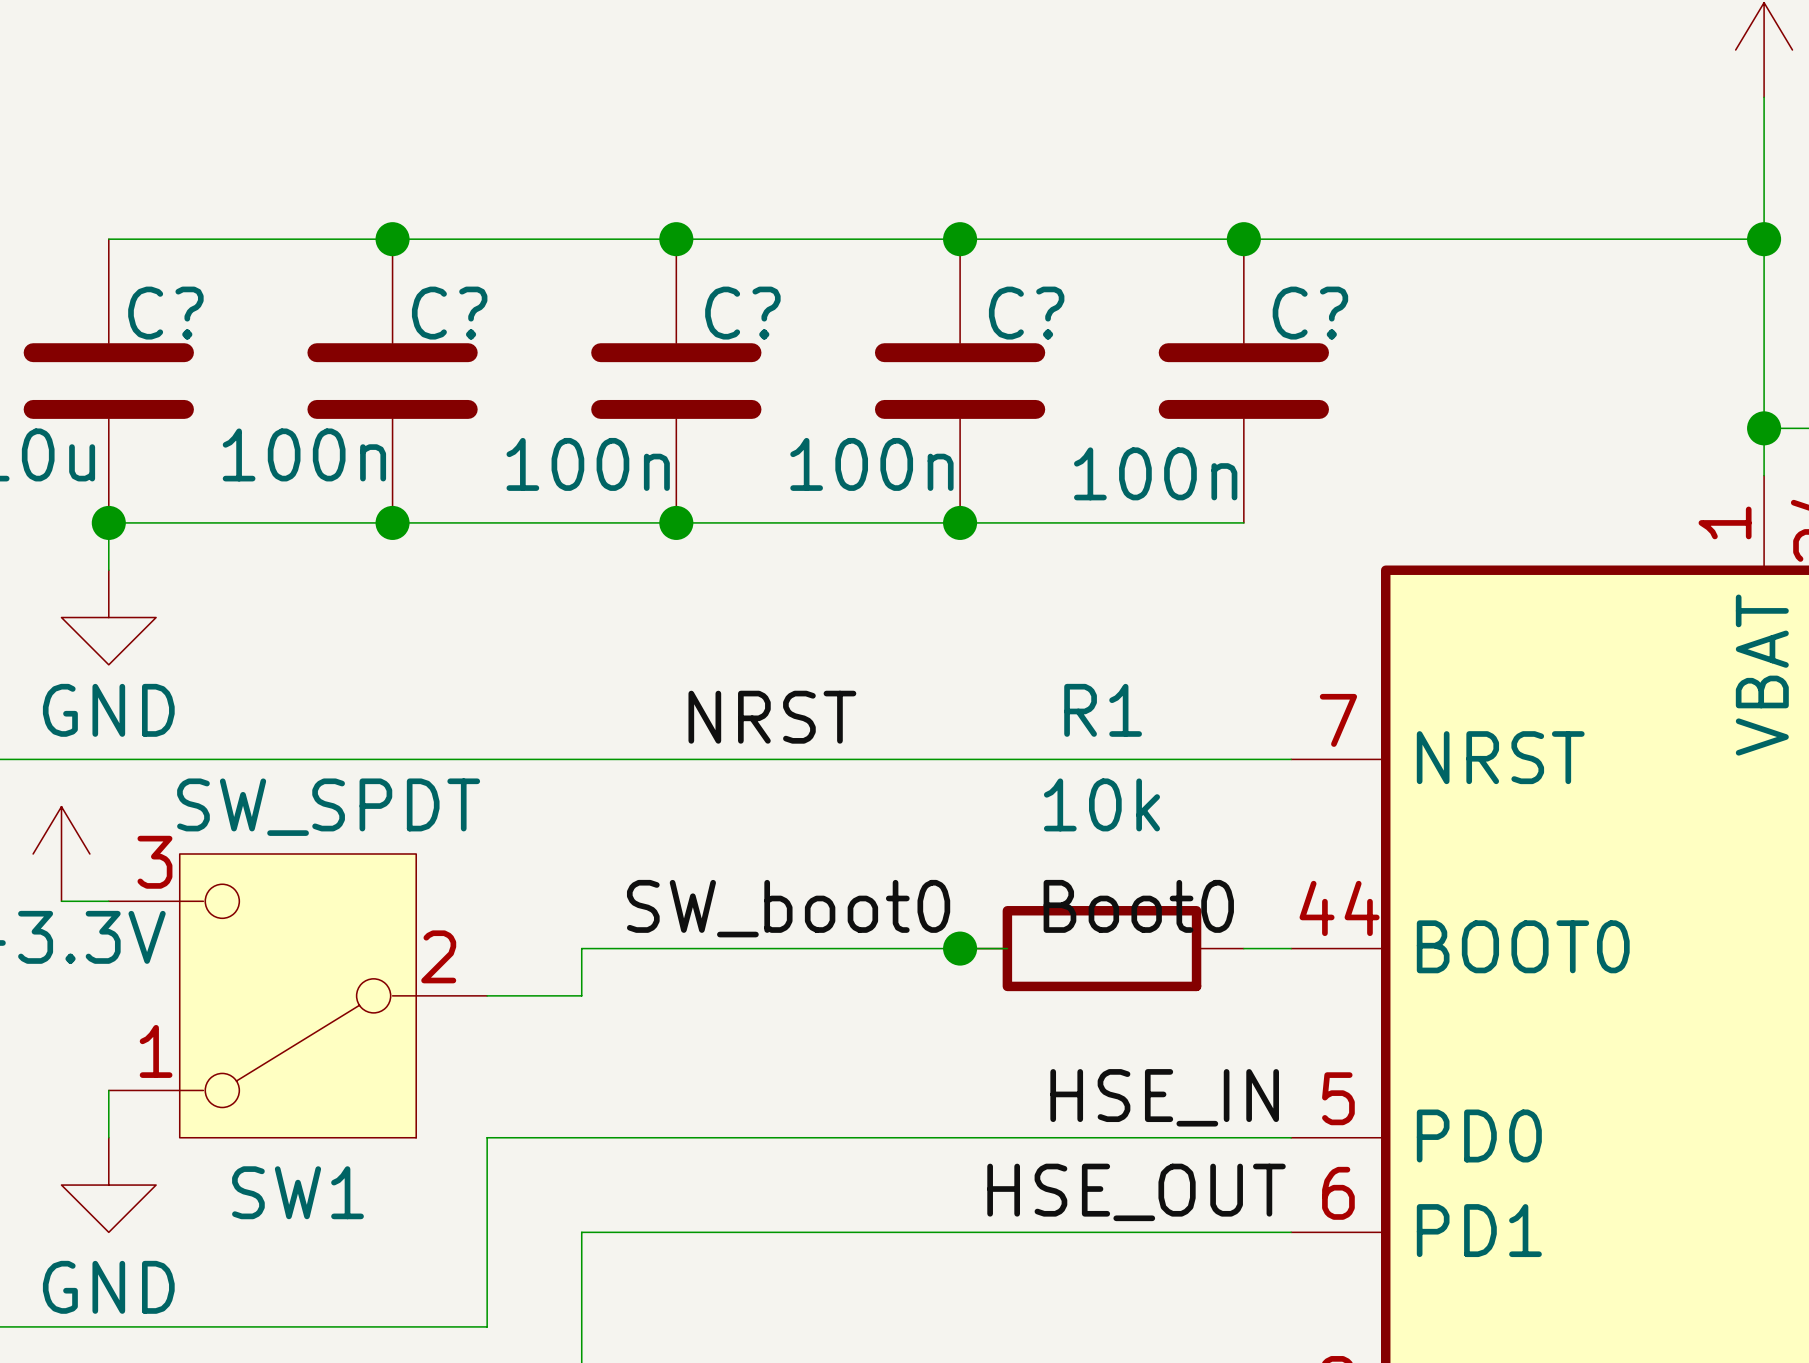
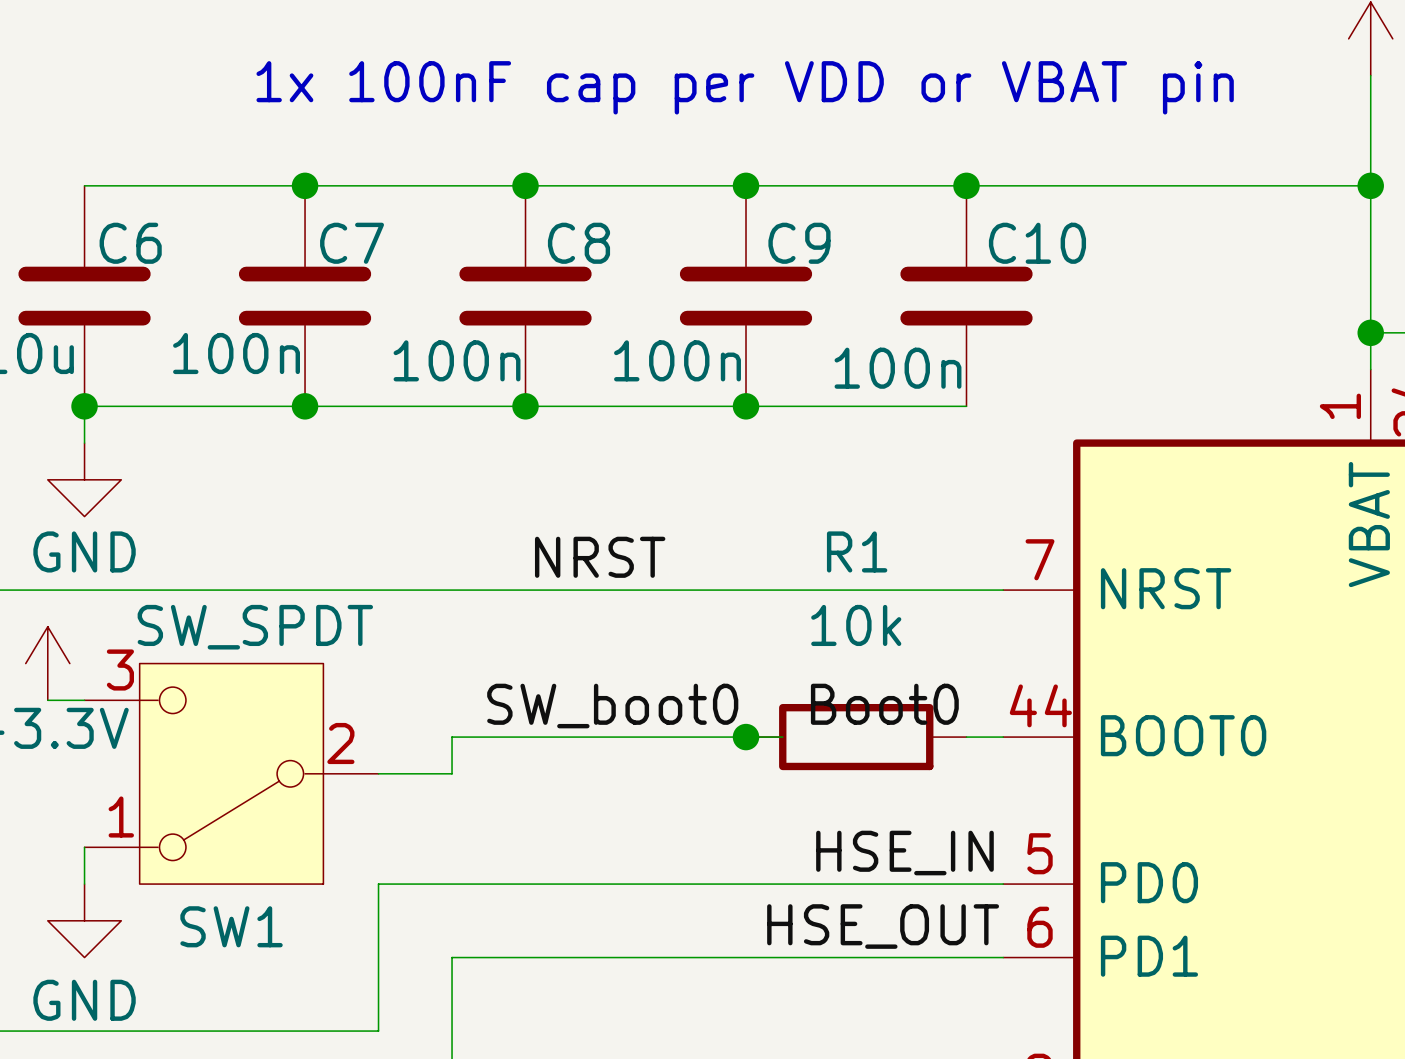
text: none -> 1x 100nF cap per VDD or VBAT pin (745, 87)
C? name: C? (165, 313) -> C6 (130, 243)
C? name: C? (449, 313) -> C7 (352, 243)
C? name: C? (742, 313) -> C8 (578, 243)
C? name: C? (1026, 313) -> C9 (799, 243)
C? name: C? (1310, 313) -> C10 (1037, 243)

